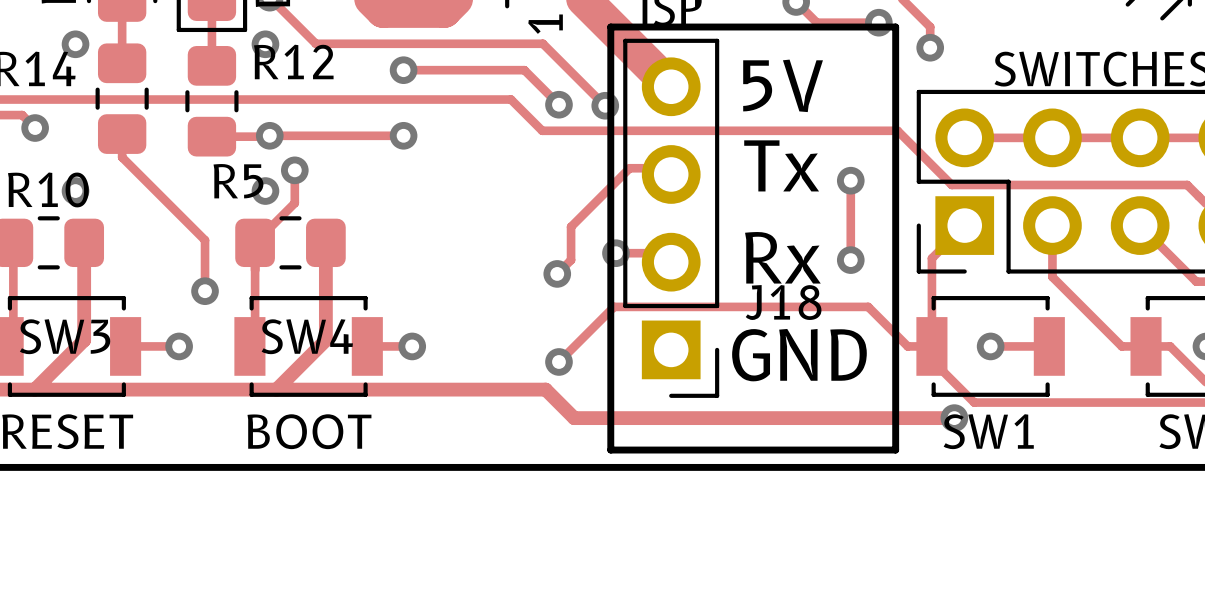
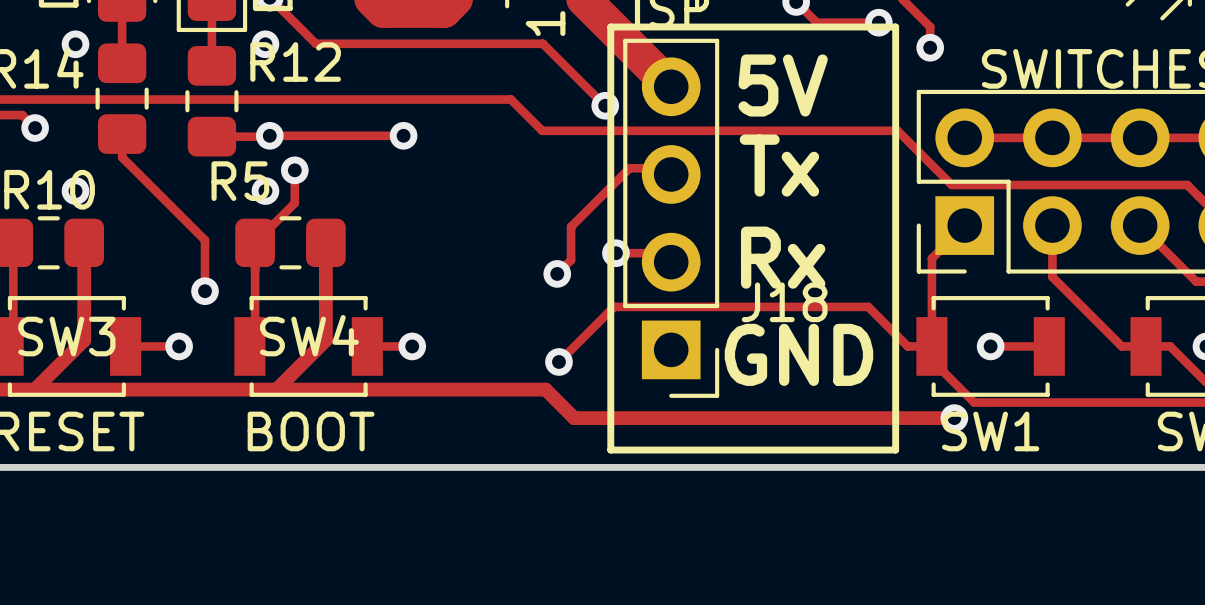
track: (403, 70) (524, 70) (558, 104) -> none
via: (403, 70) -> none
via: (558, 104) -> none
track: (850, 180) (850, 260) -> none
via: (850, 180) -> none
via: (850, 260) -> none

